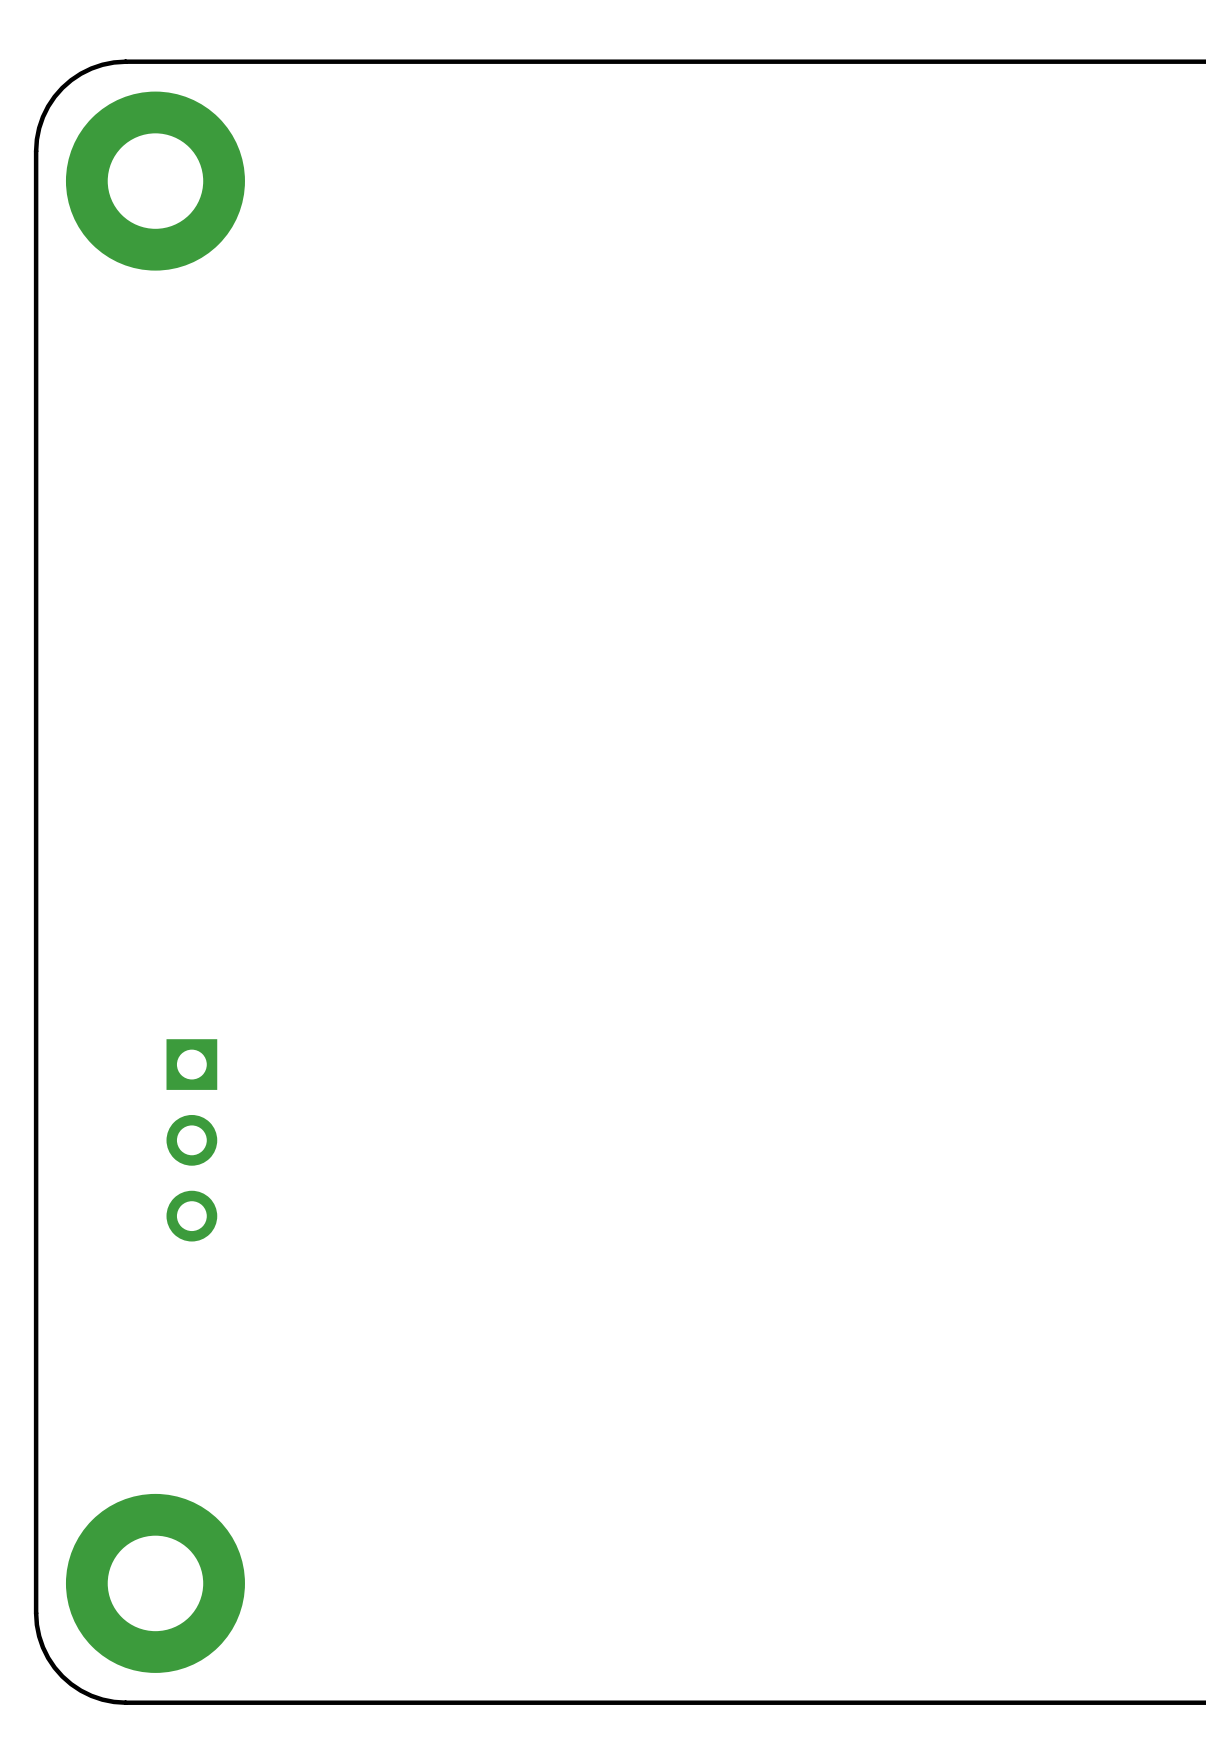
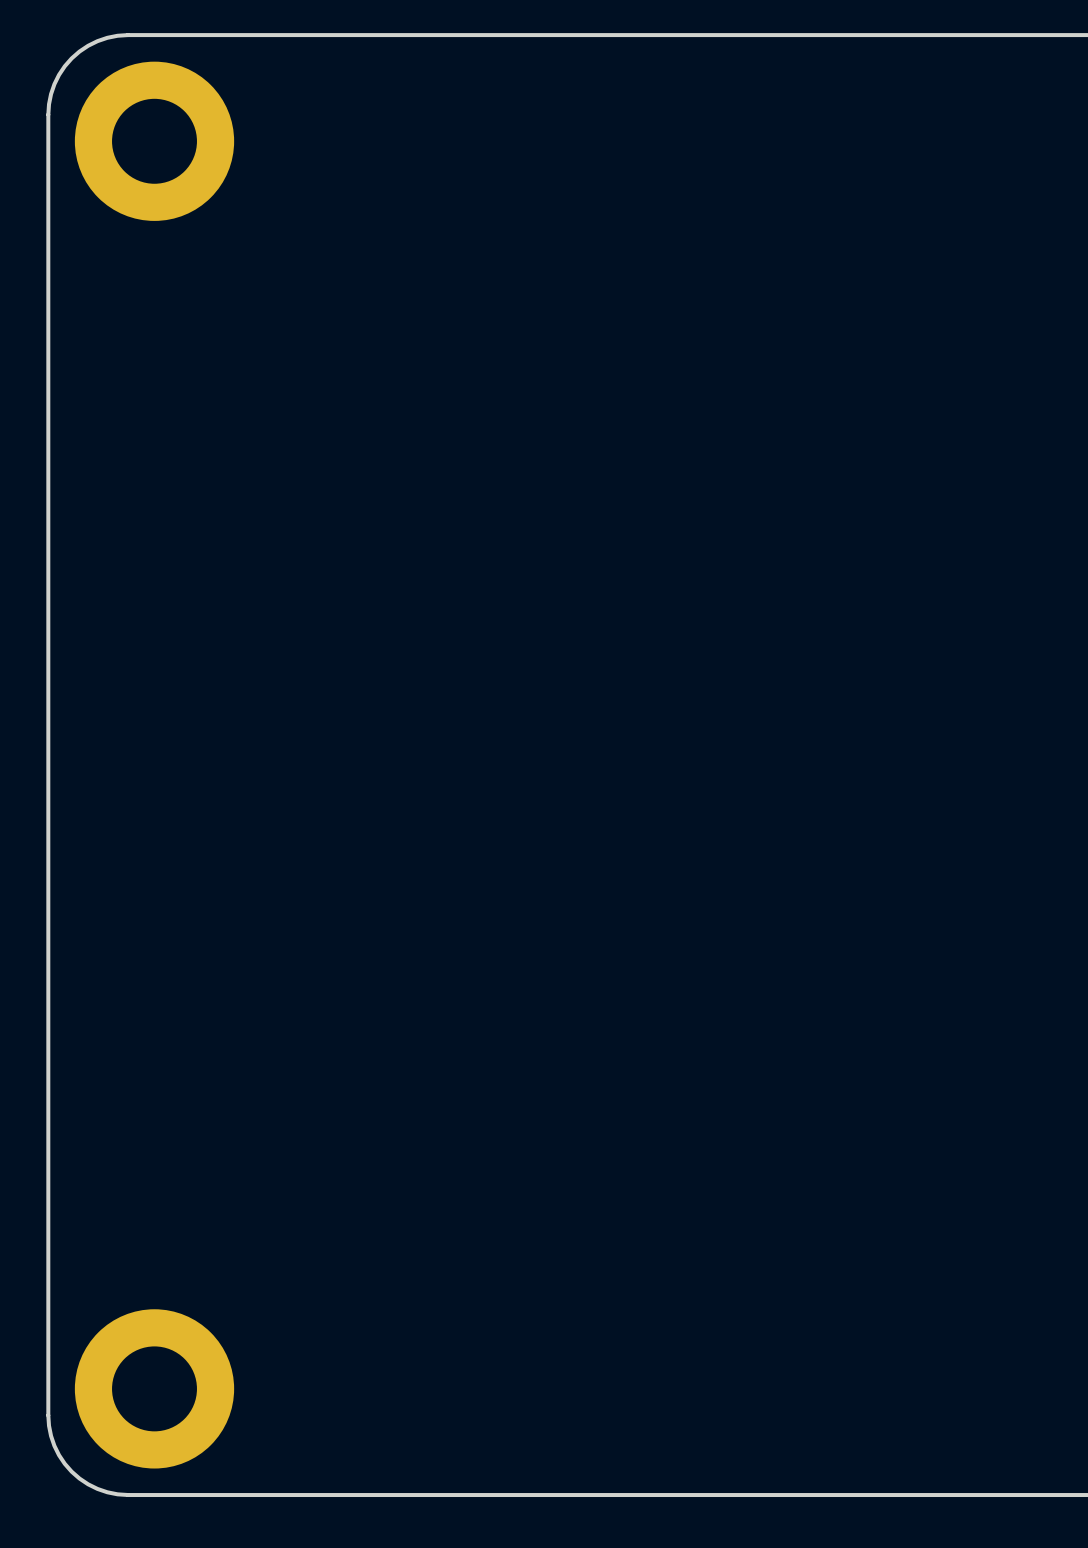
part: (191, 1140) -> none

